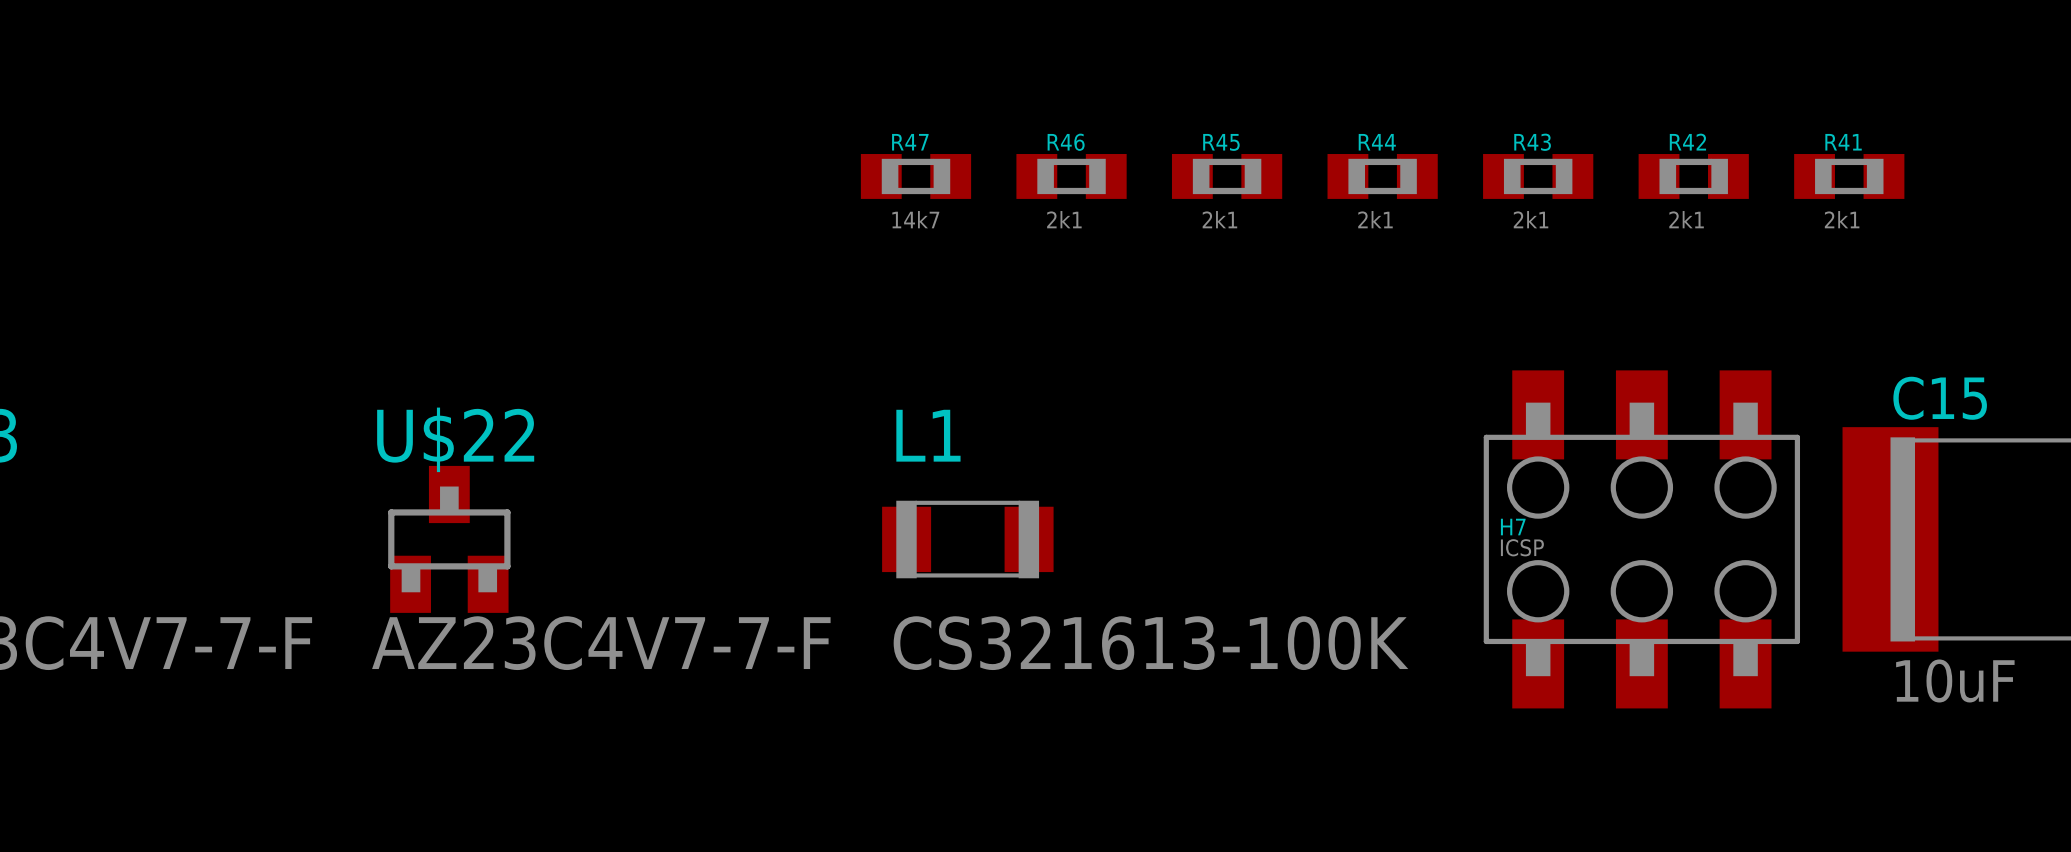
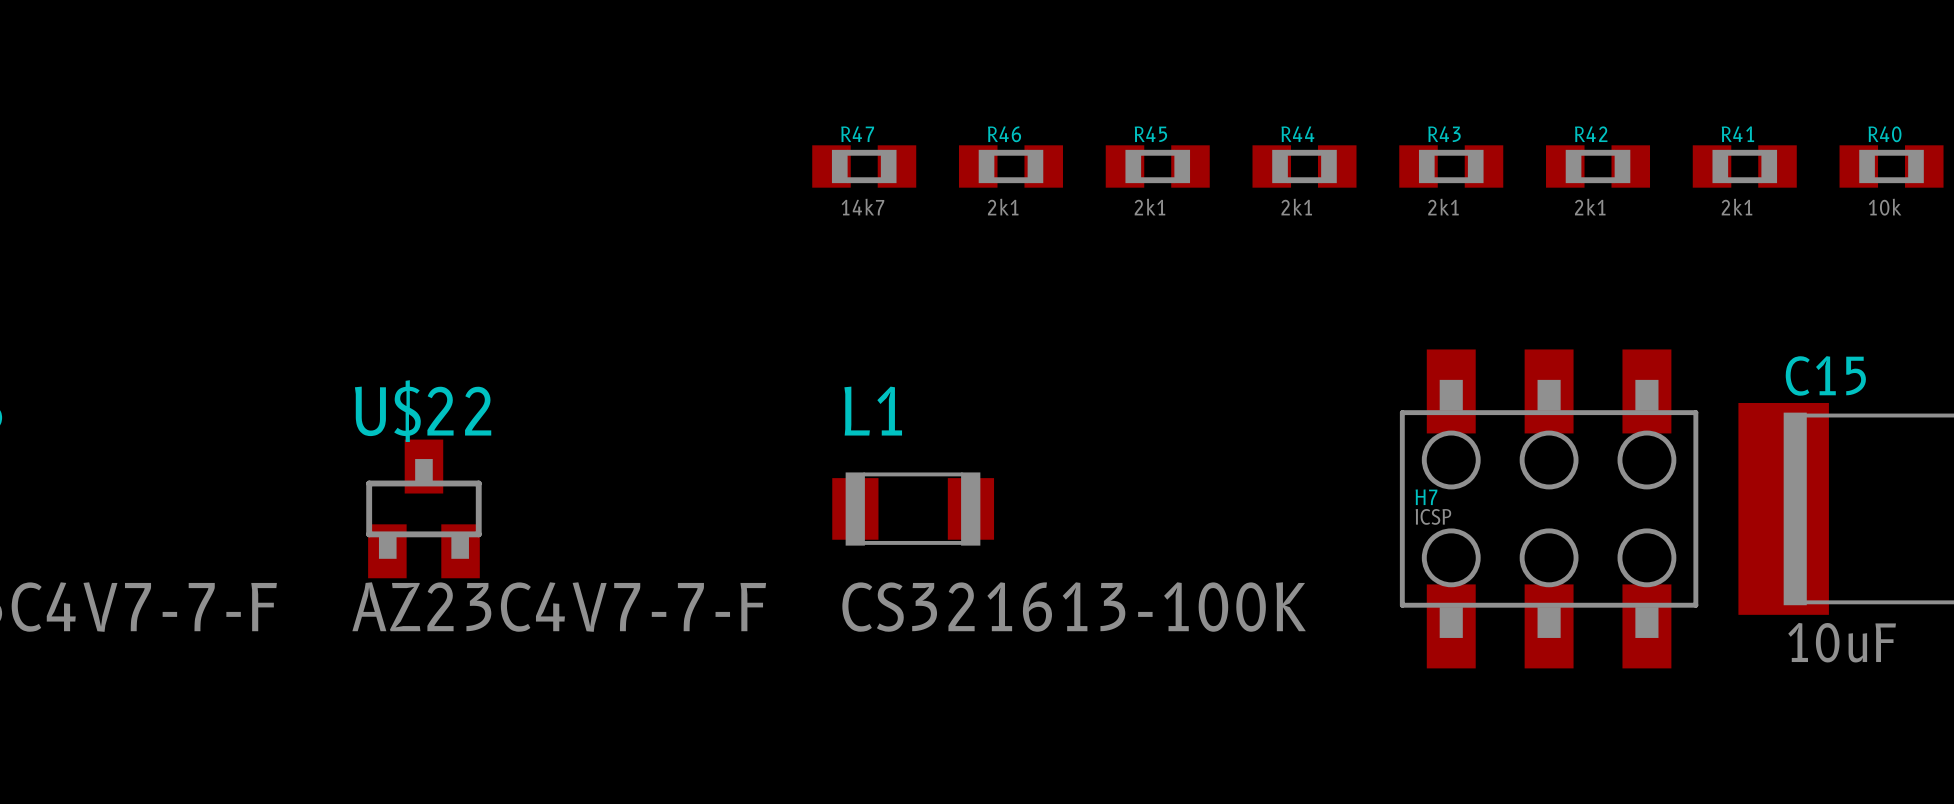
R40: none -> 10k (1891, 166)

